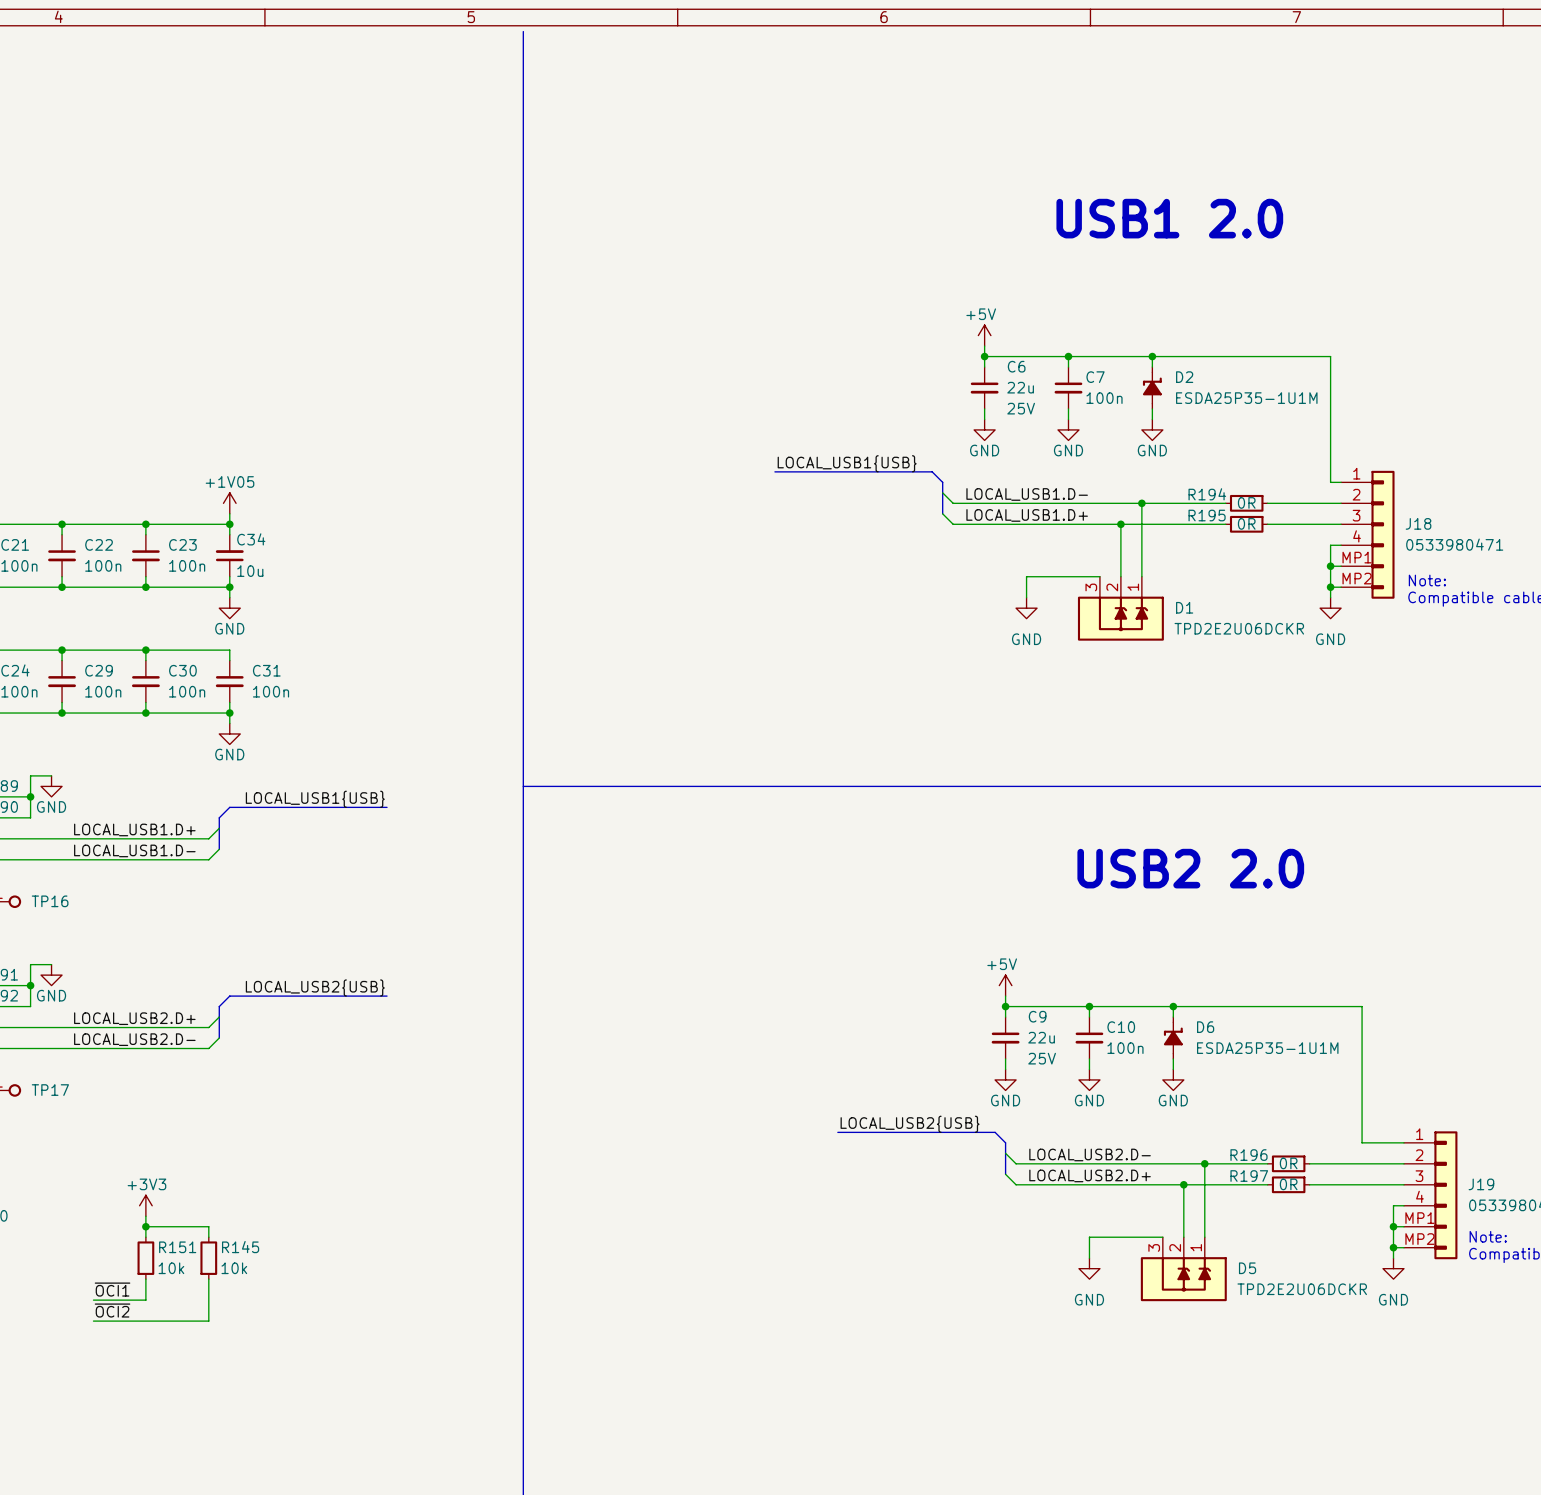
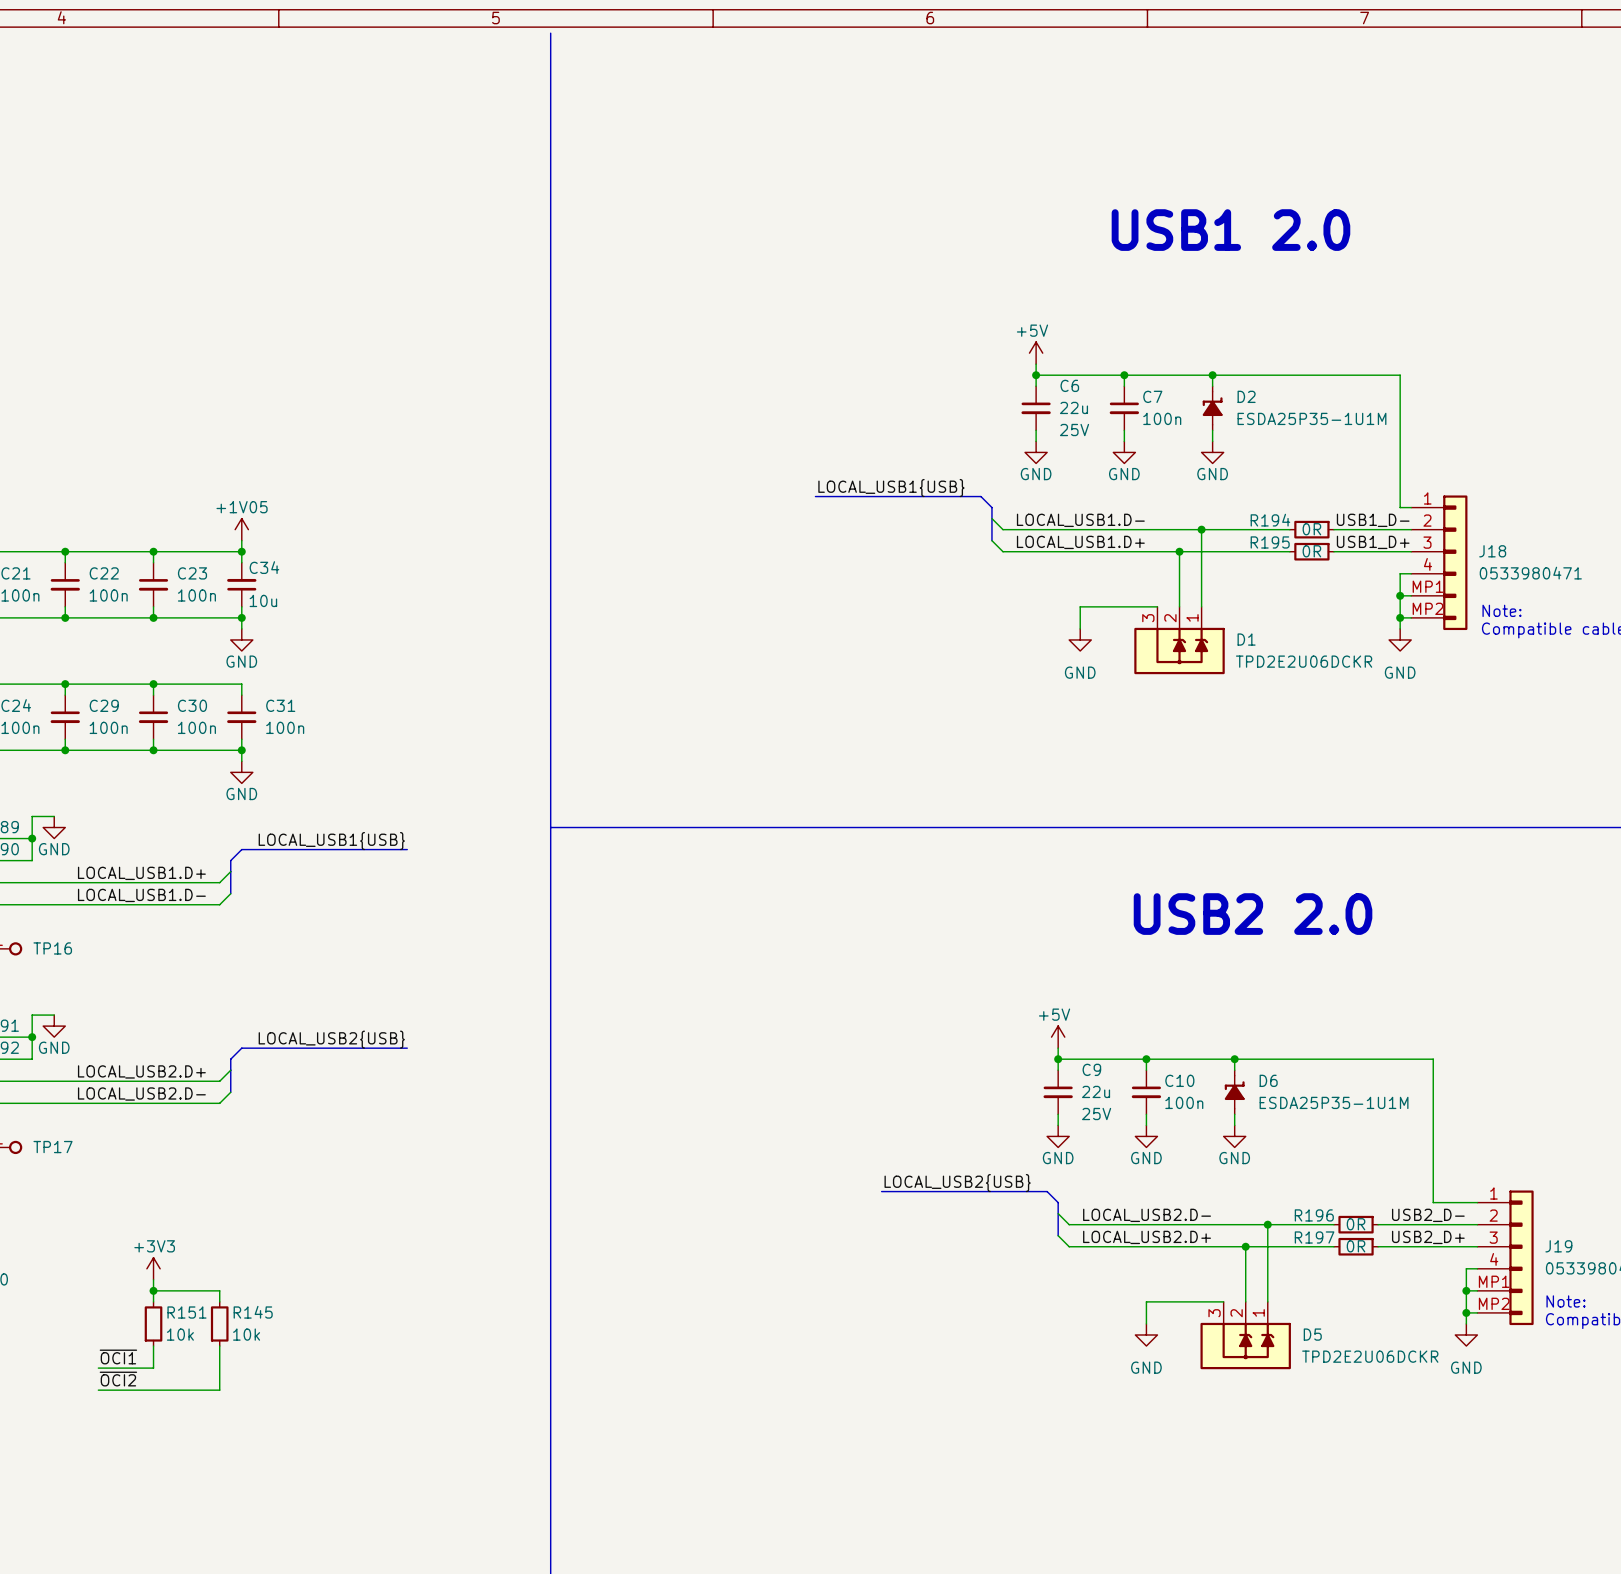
label: none -> USB1_D- (1373, 520)
label: none -> USB1_D+ (1373, 542)
label: none -> USB2_D- (1428, 1215)
label: none -> USB2_D+ (1428, 1237)

